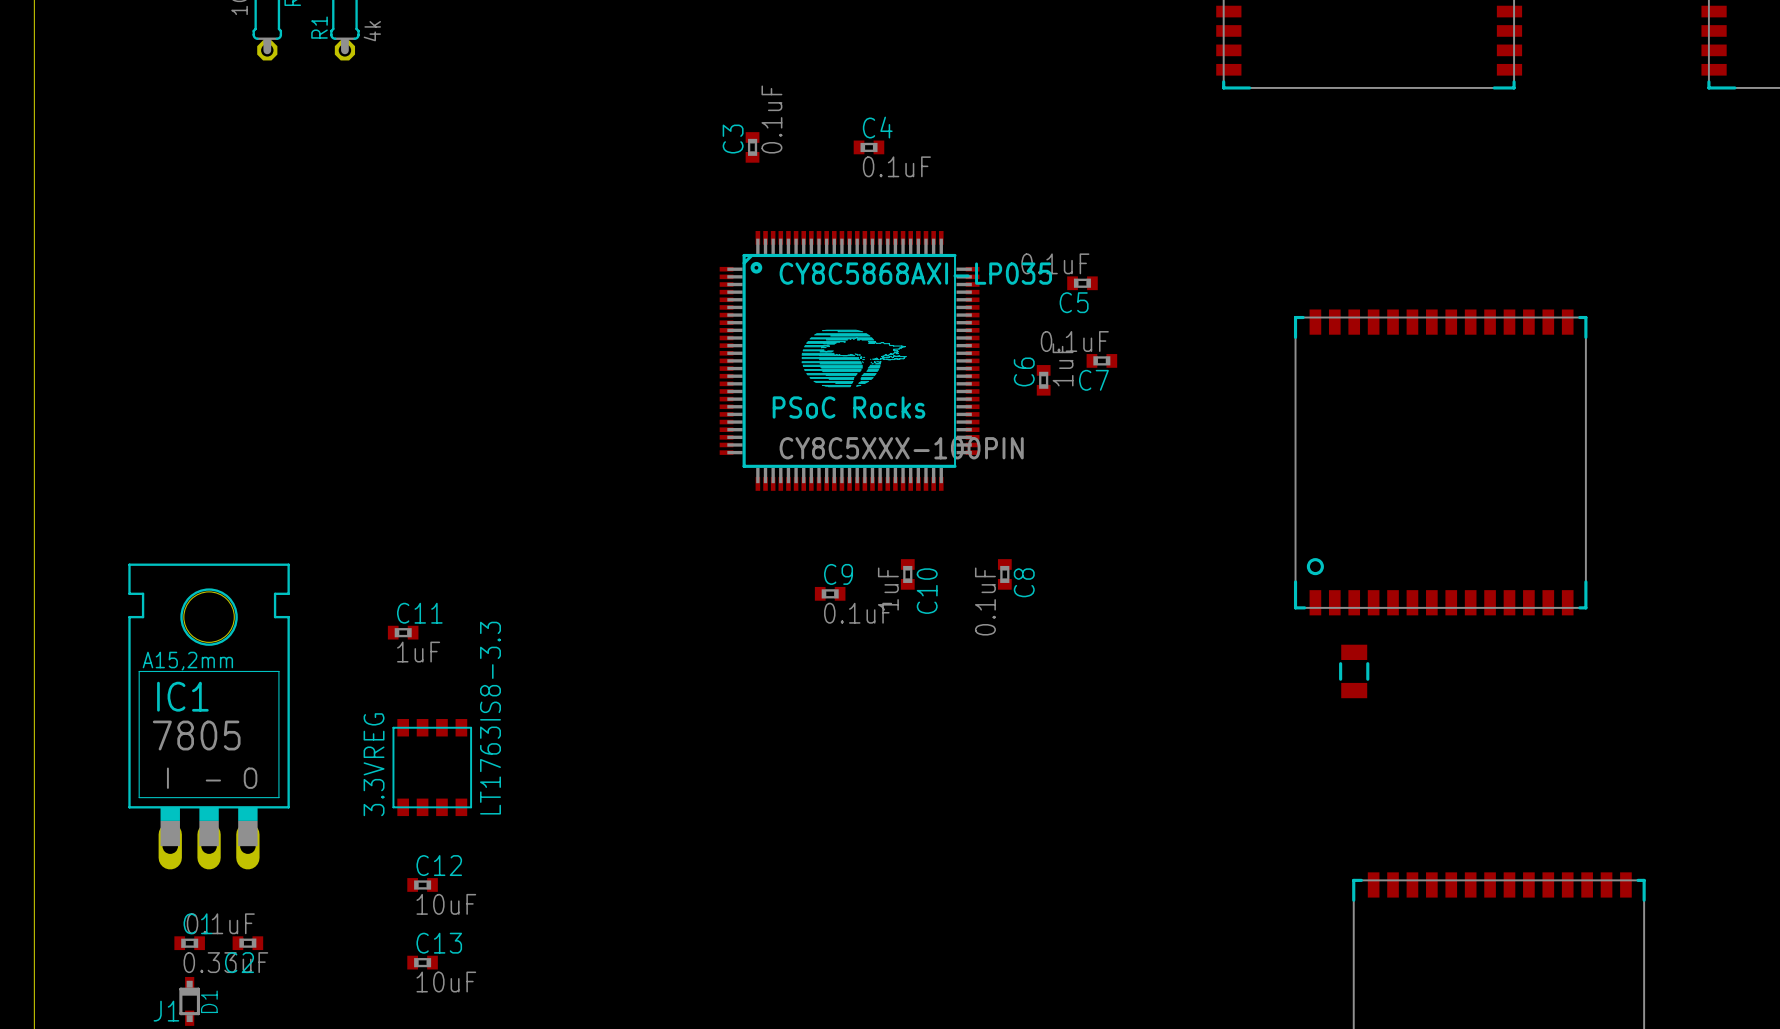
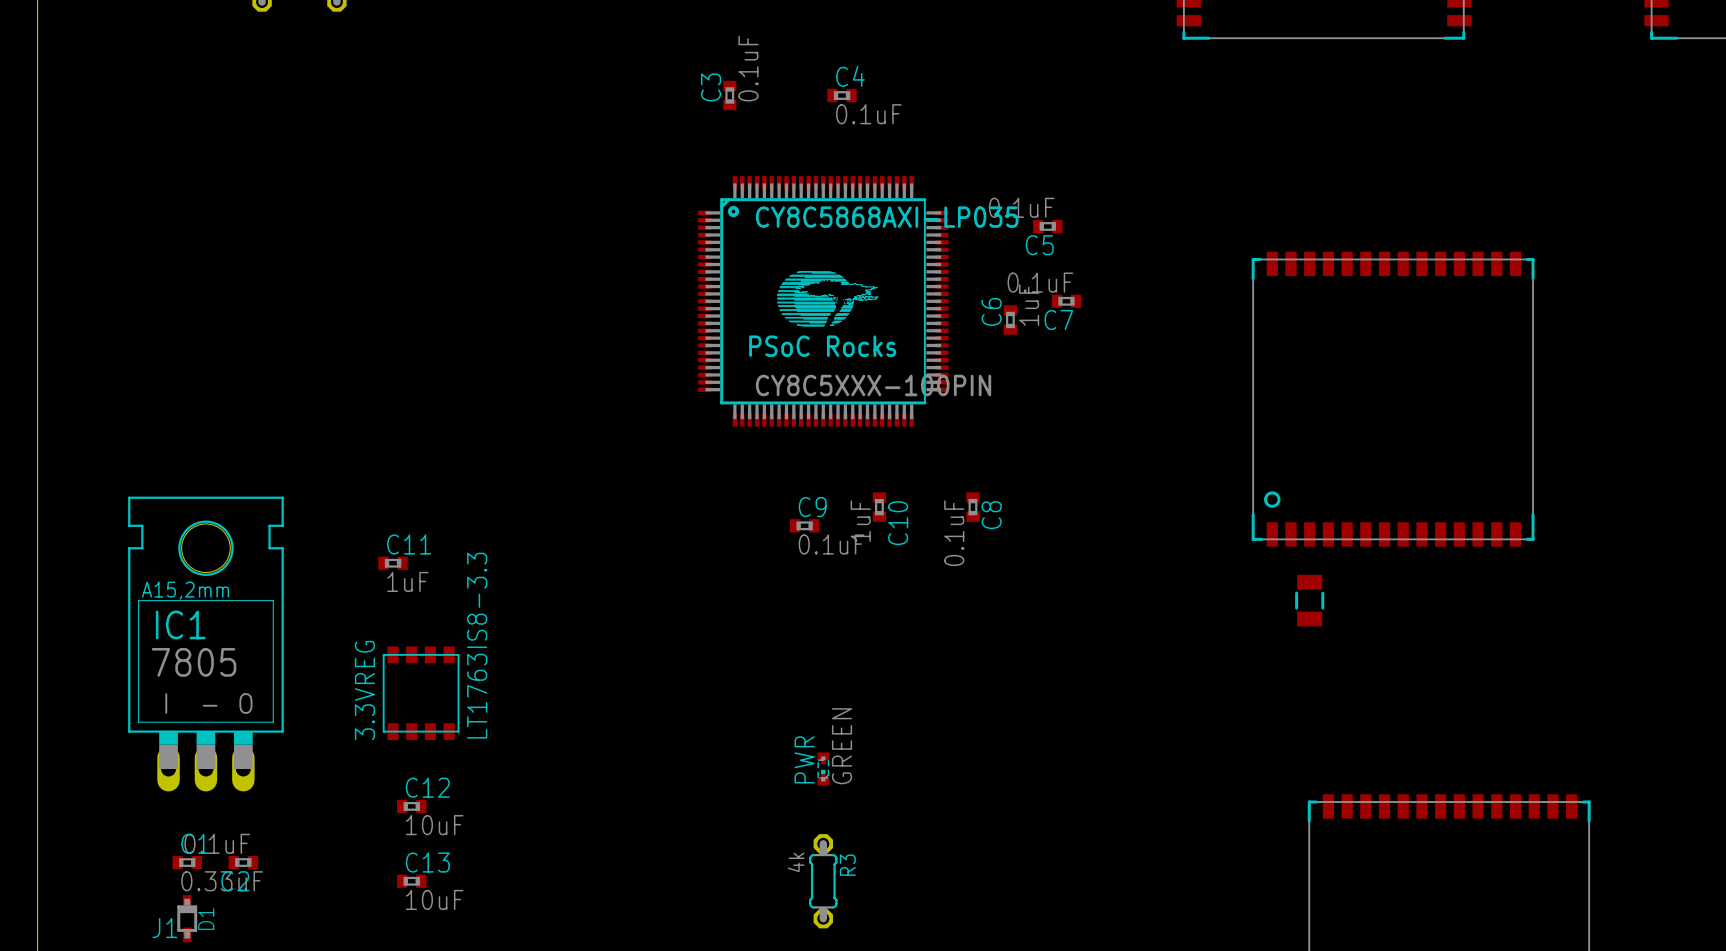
PWR: none -> GREEN (823, 769)
R3: none -> 4k (823, 881)

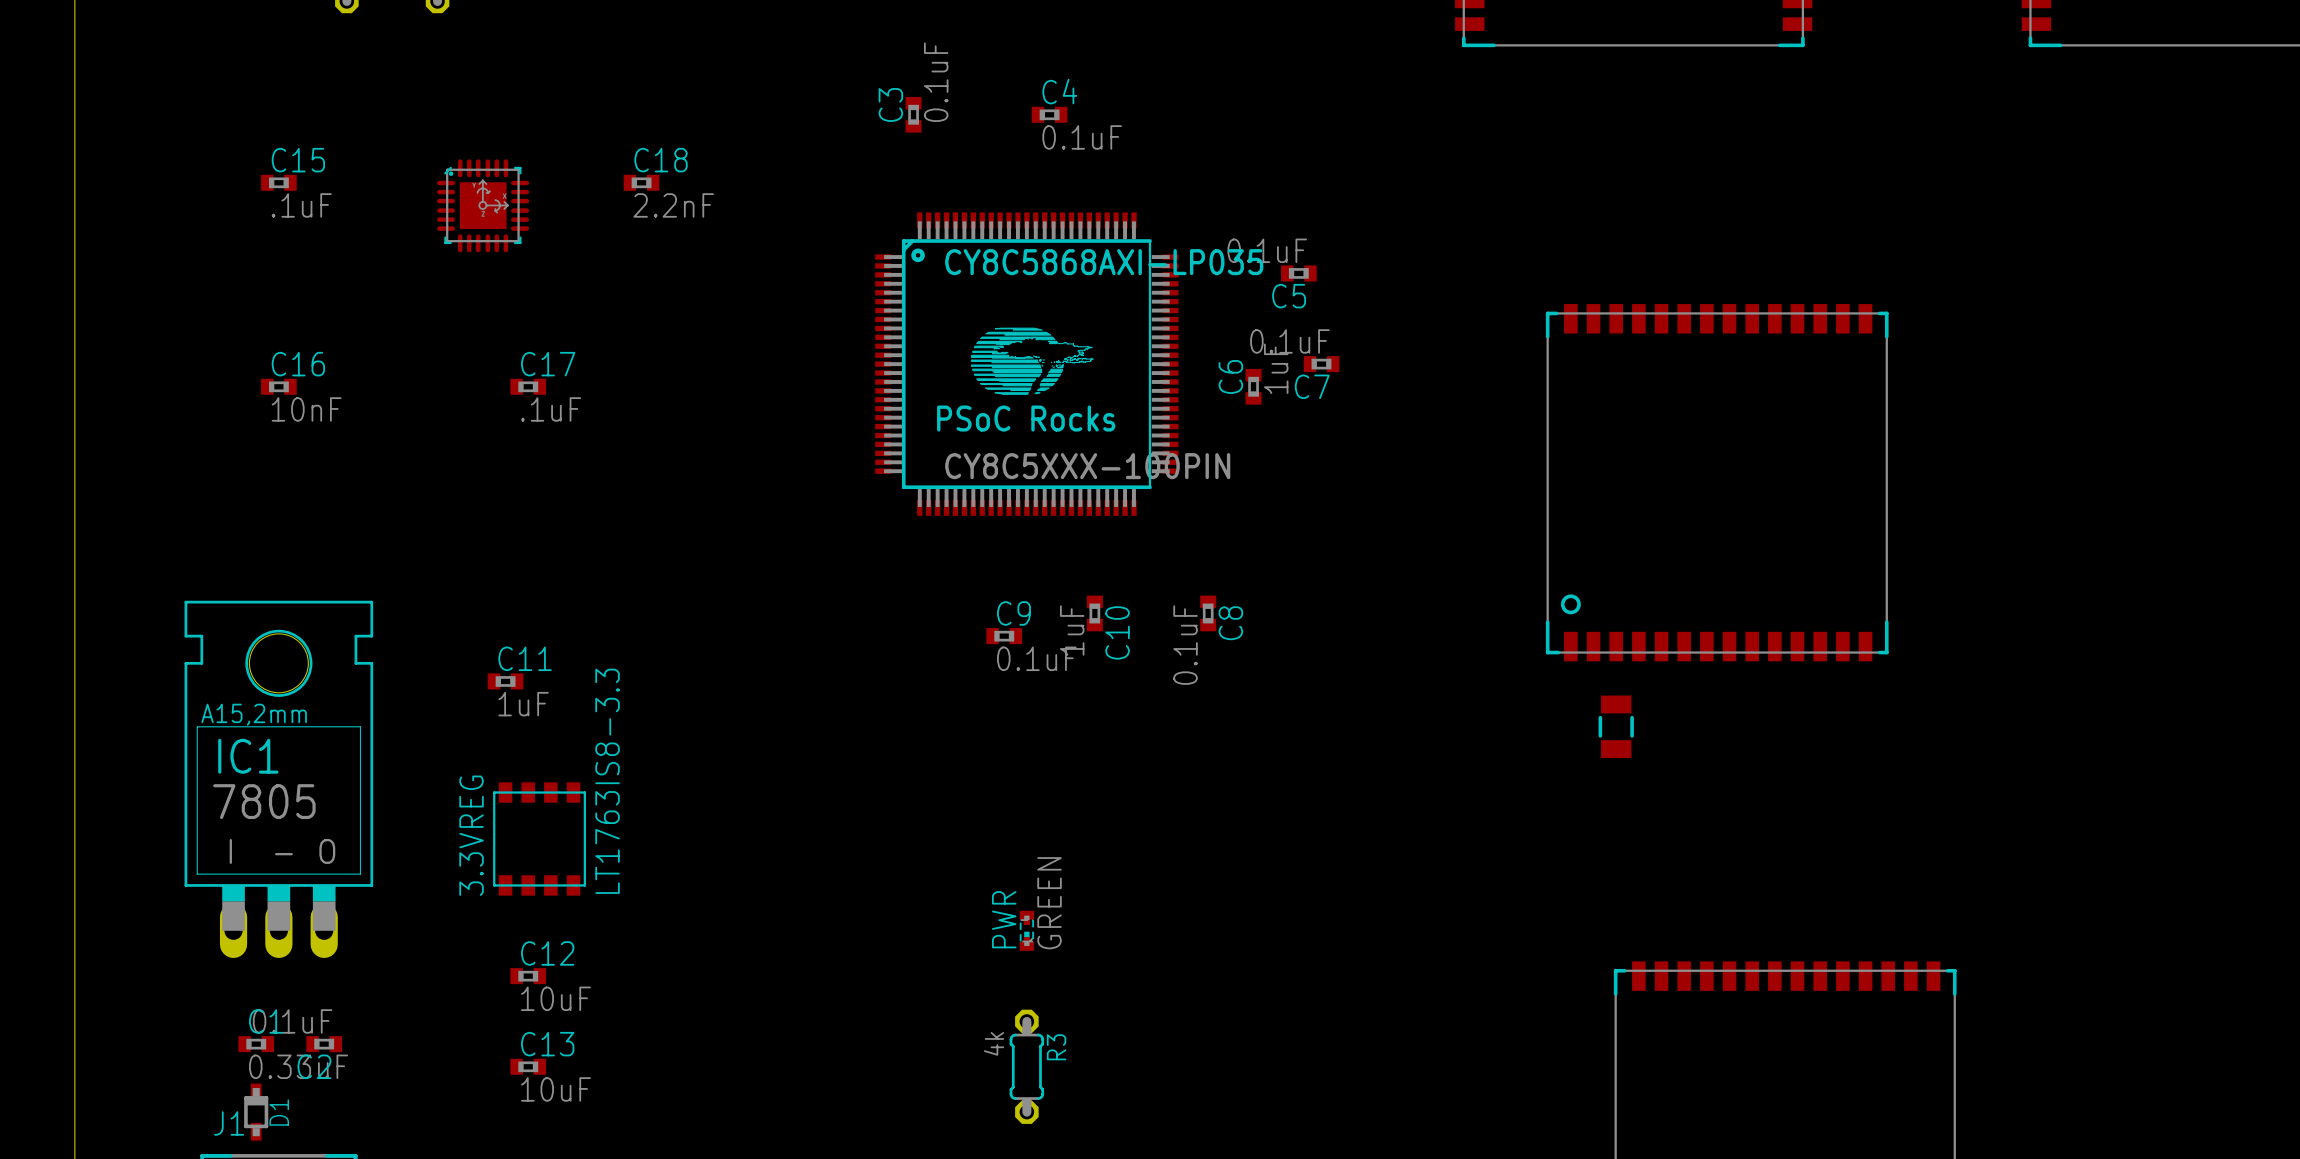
C15: none -> .1uF (278, 182)
C18: none -> 2.2nF (641, 182)
part: none -> (483, 205)
C16: none -> 10nF (278, 386)
C17: none -> .1uF (528, 386)

